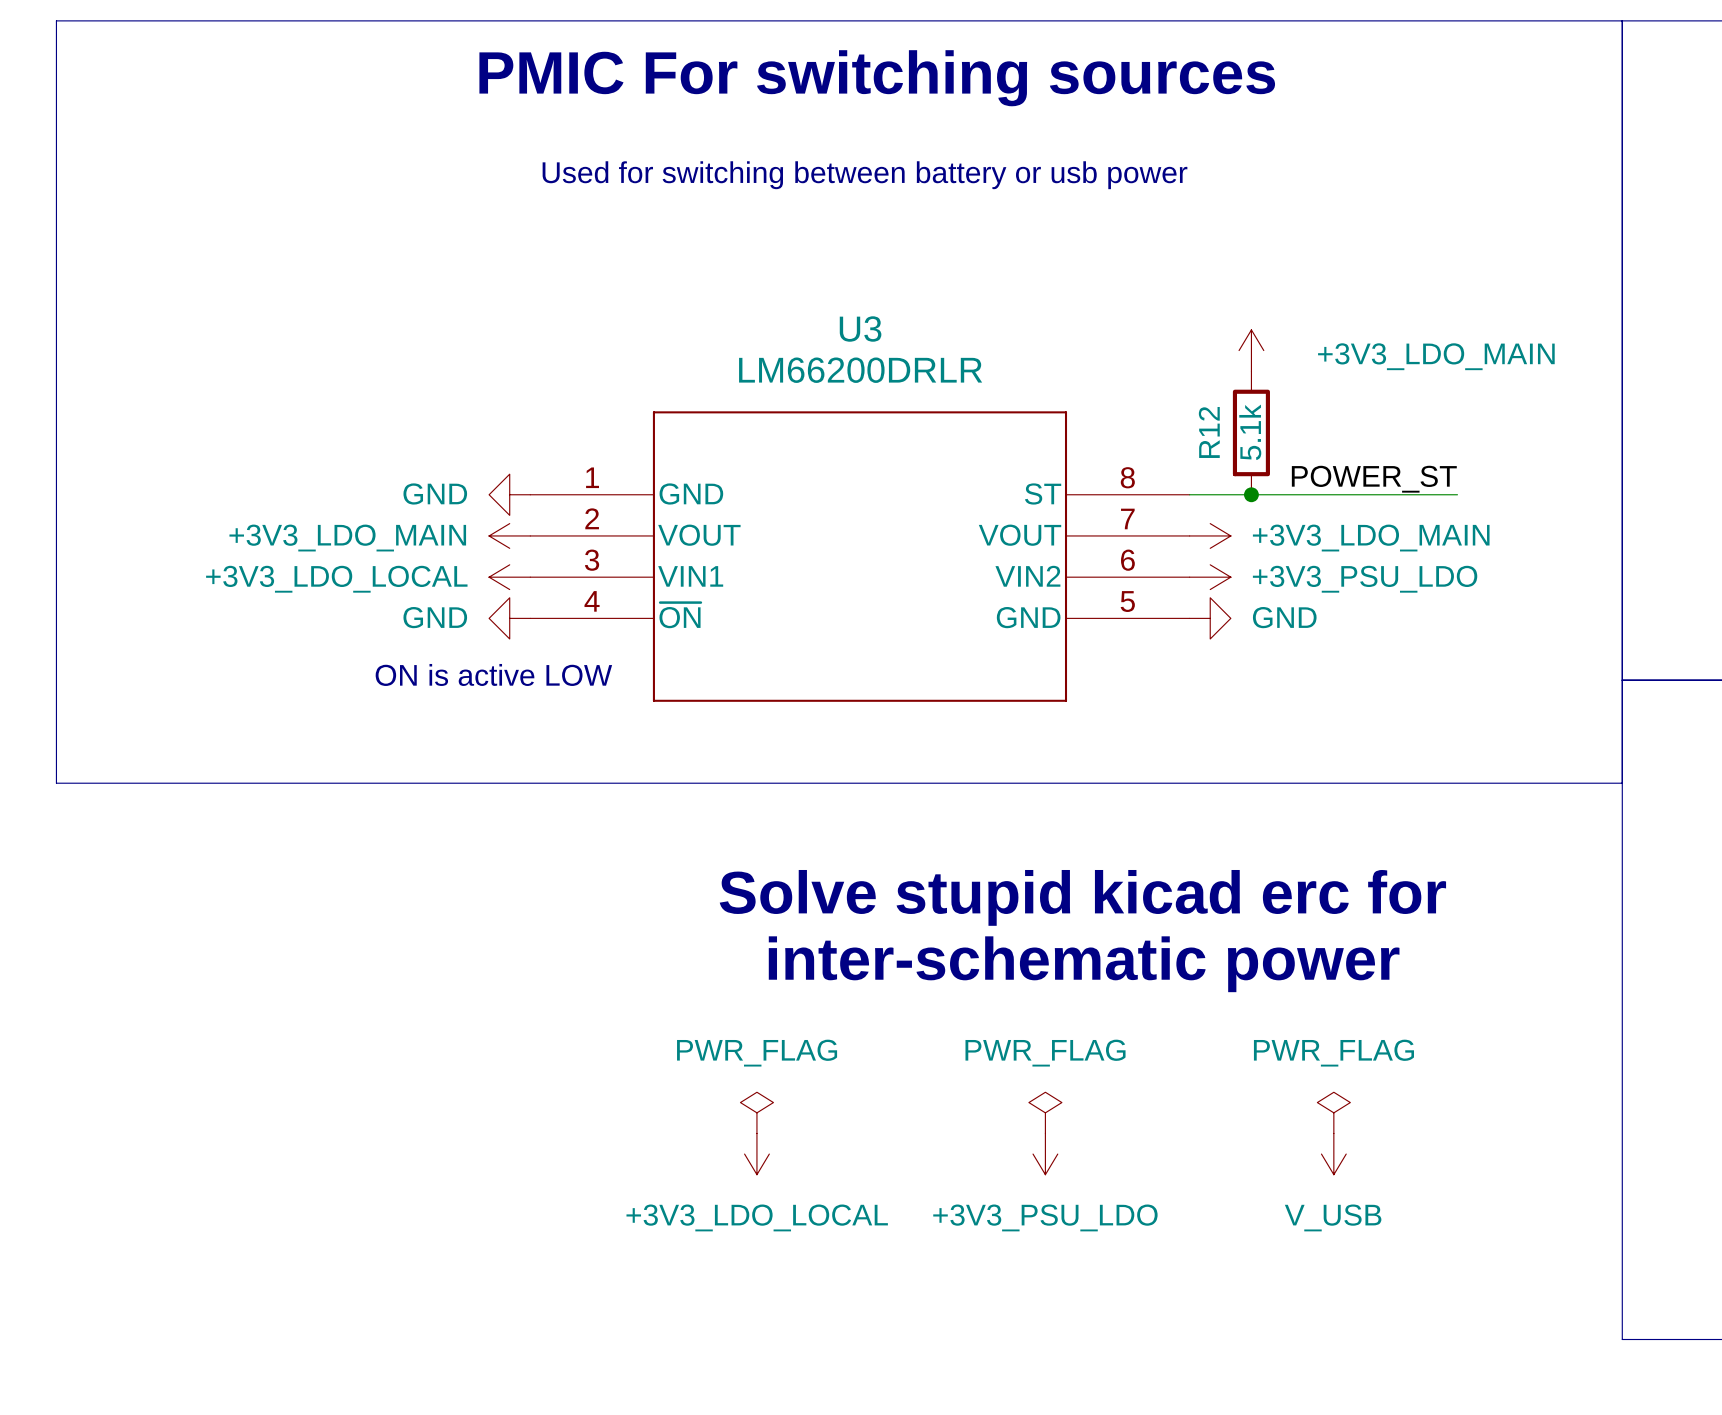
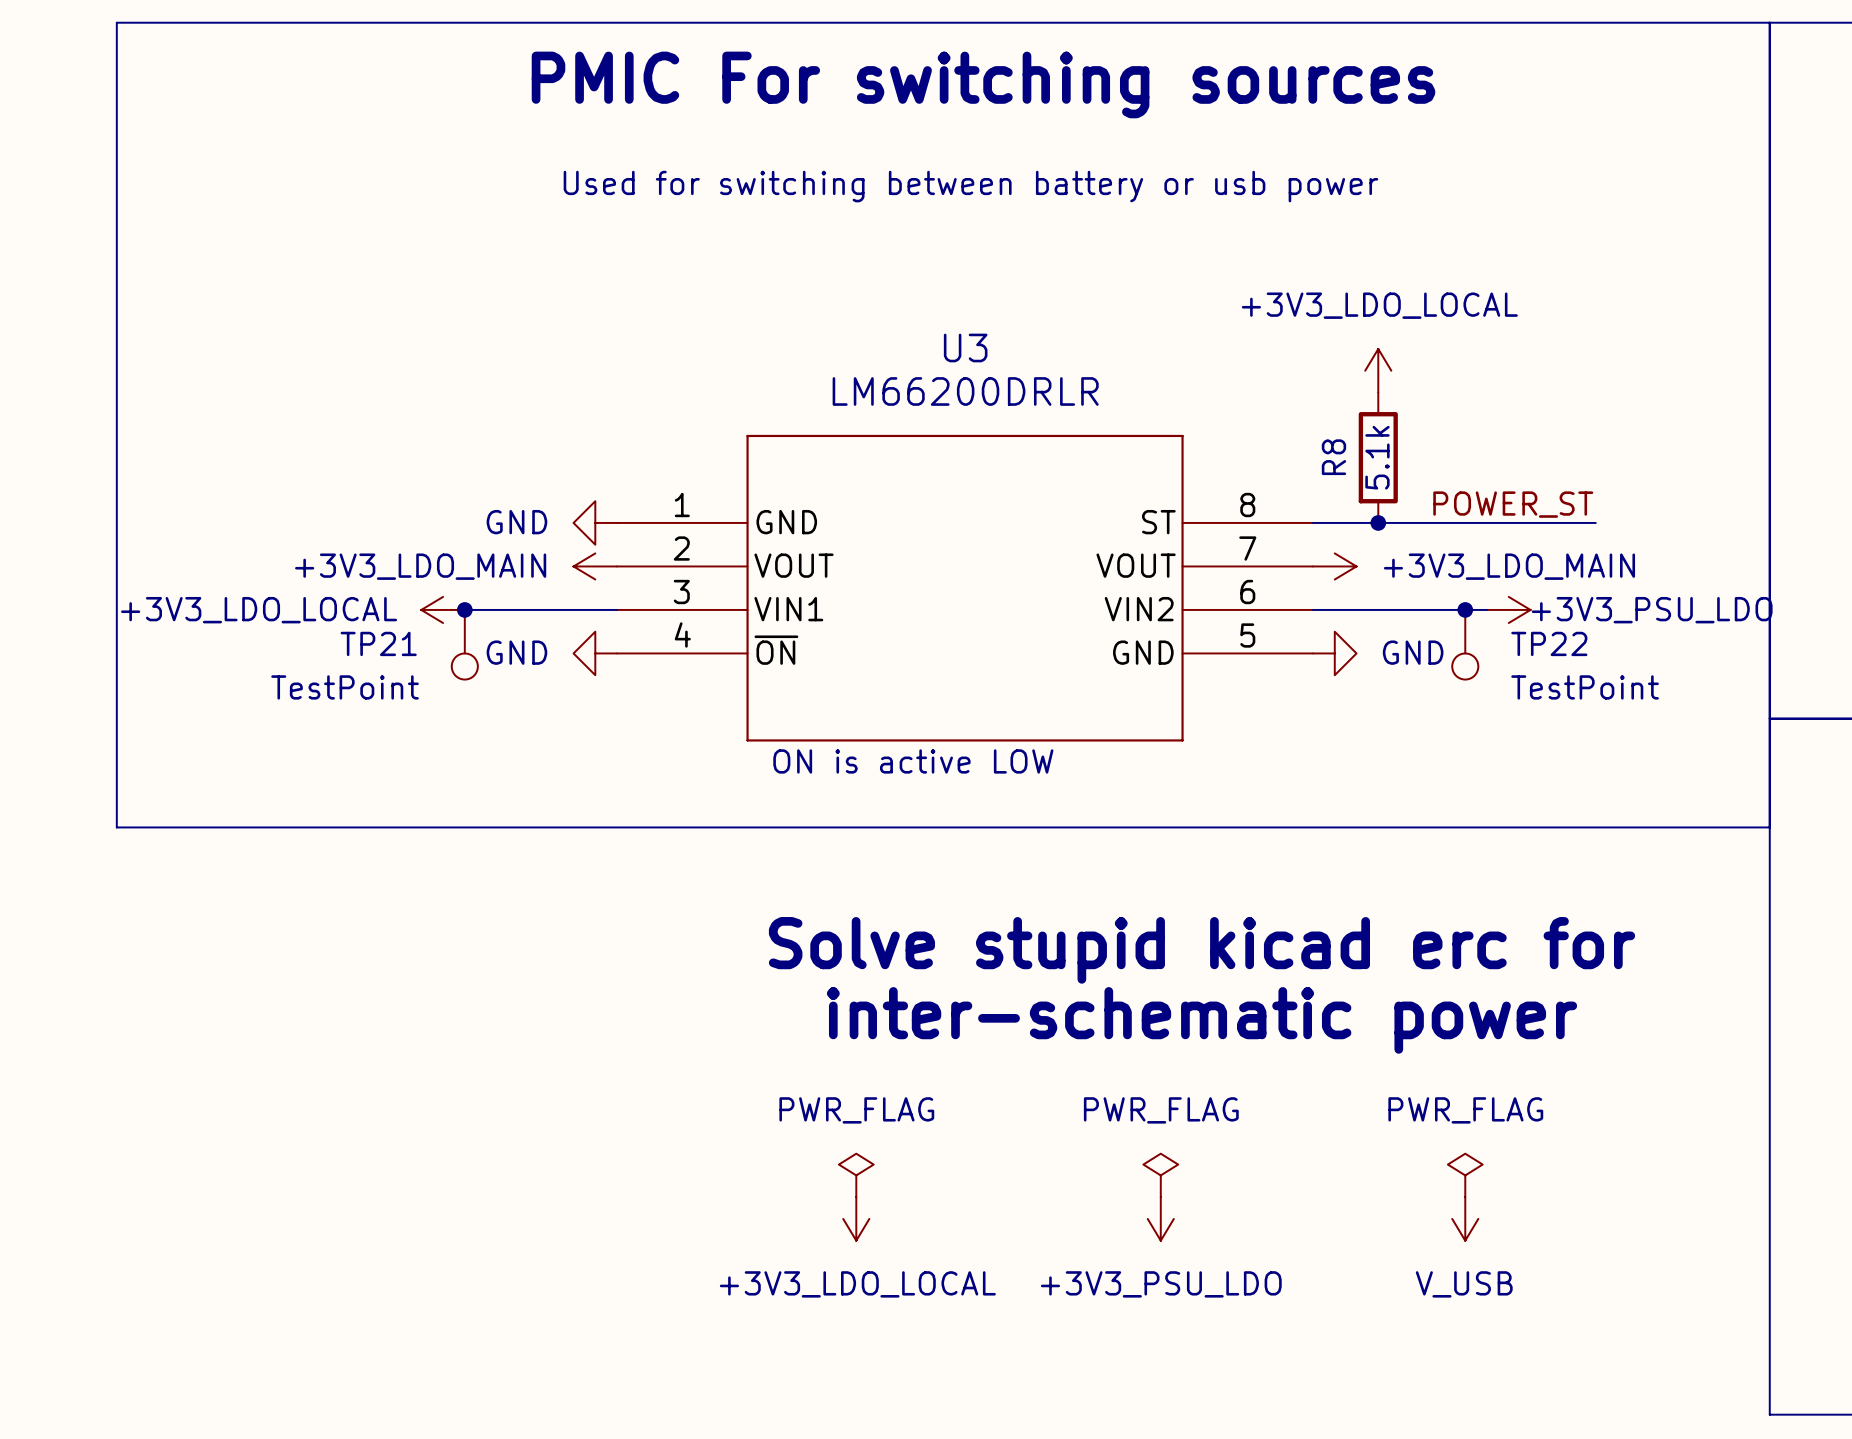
power symbol: +3V3_LDO_MAIN (1251, 350) -> +3V3_LDO_LOCAL (1378, 370)
R12 name: R12 (1209, 432) -> R8 (1333, 457)
wire: none -> (464, 609) (617, 609)
junction: none -> (464, 609)
power symbol position: +3V3_LDO_LOCAL (509, 577) -> +3V3_LDO_LOCAL (443, 609)
wire: none -> (1313, 609) (1487, 609)
power symbol position: +3V3_PSU_LDO (1210, 577) -> +3V3_PSU_LDO (1508, 609)
junction: none -> (1465, 609)
power symbol text position: +3V3_PSU_LDO (1365, 579) -> +3V3_PSU_LDO (1652, 610)
TP21: none -> TestPoint (464, 644)
TP22: none -> TestPoint (1465, 644)
text position: ON is active LOW (493, 674) -> ON is active LOW (913, 761)

